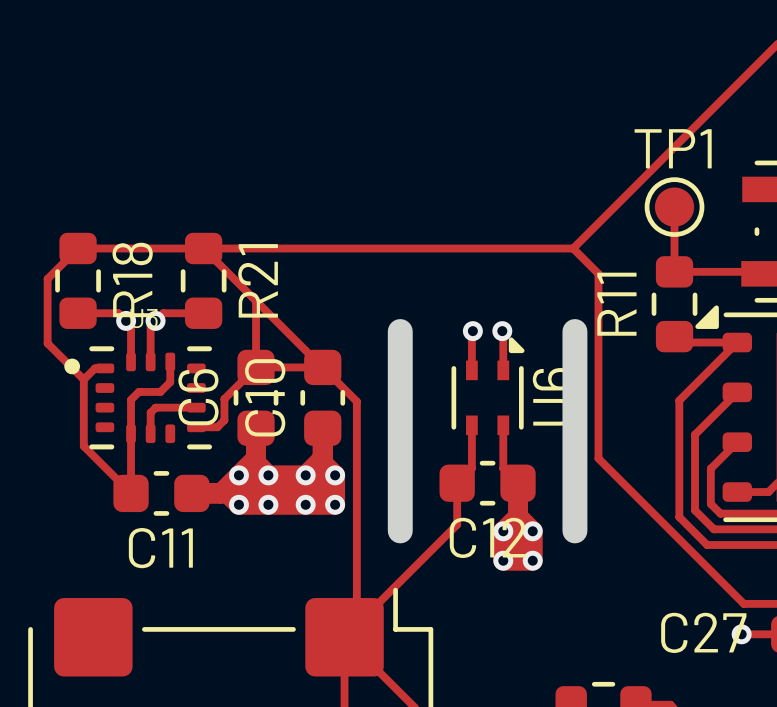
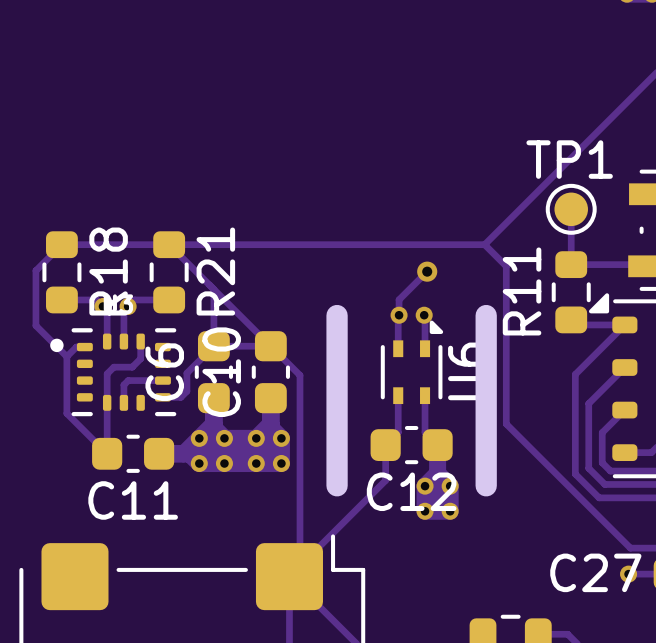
track: none -> (427, 271) (399, 299) (399, 315)
via: none -> (427, 271)

